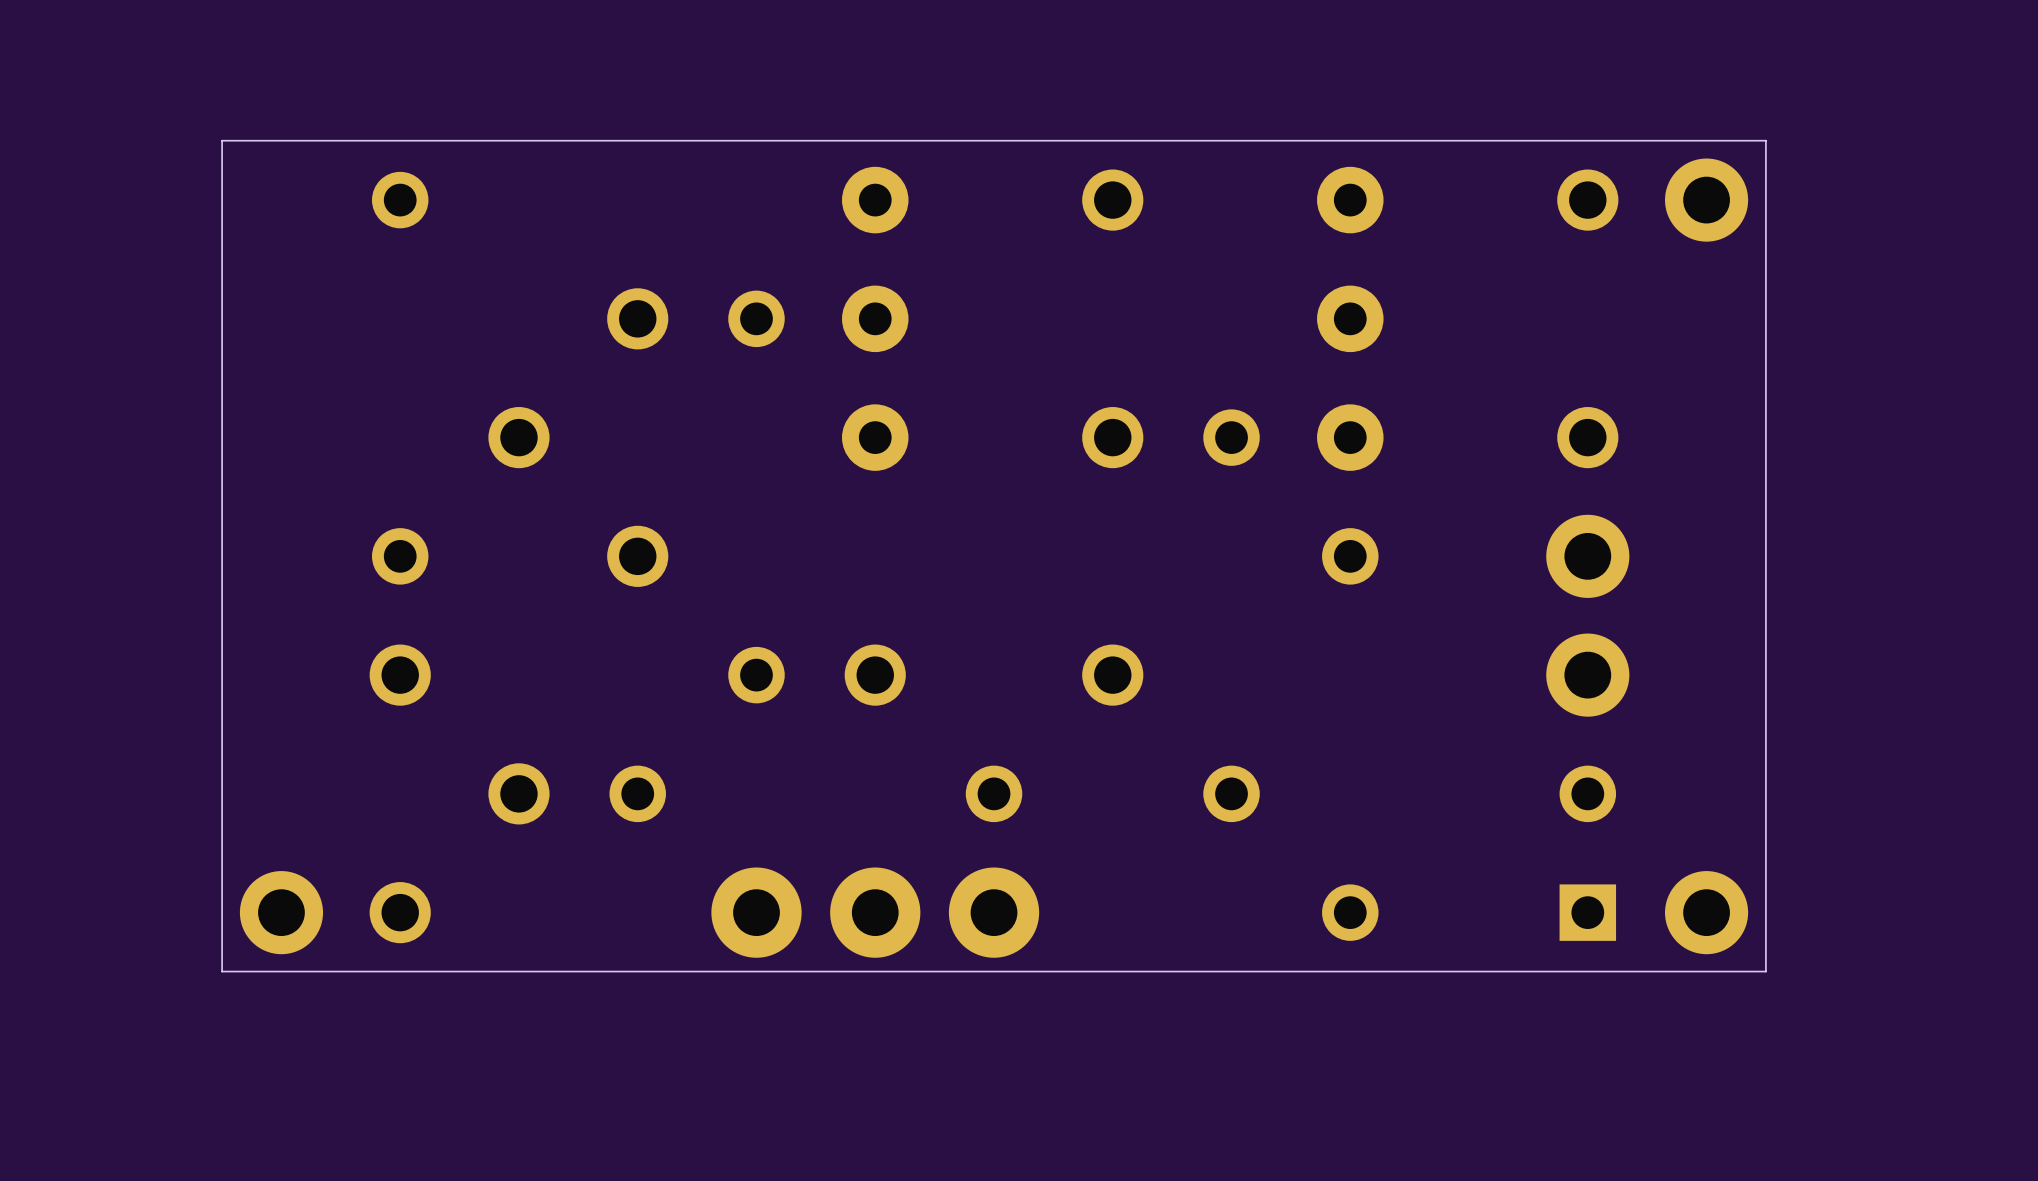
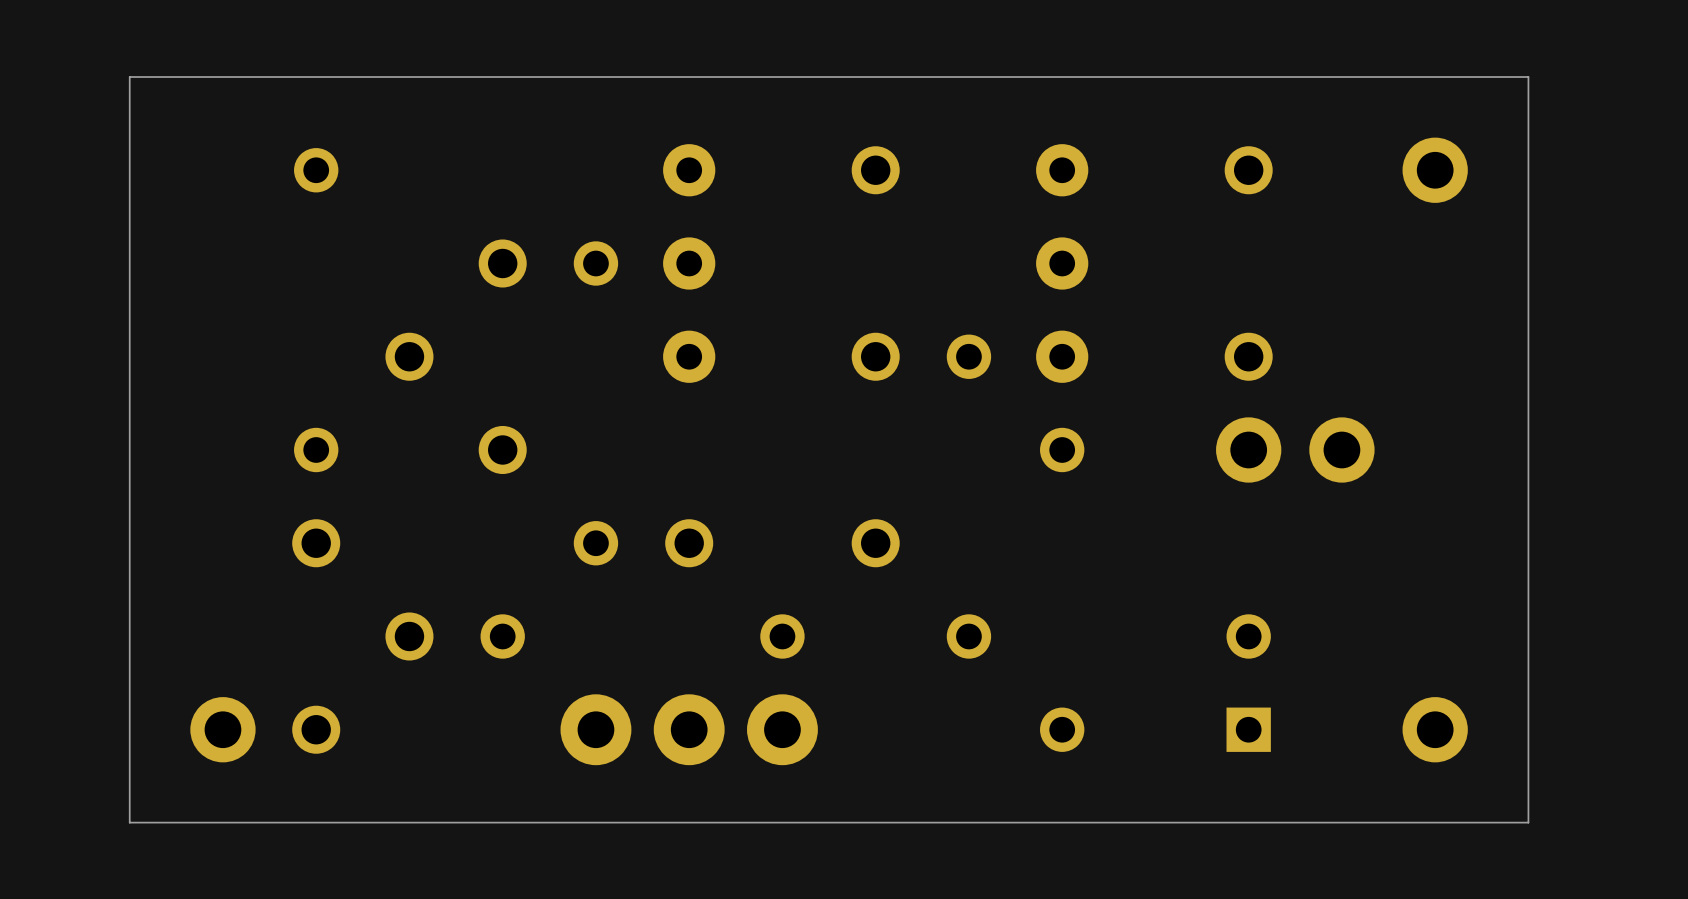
board edge: (1765, 140) (222, 140) (222, 971) (1765, 971) (1765, 140) -> (1528, 77) (1528, 822) (129, 822) (129, 77) (1528, 77)
part position: (1706, 200) -> (1435, 170)
part: none -> (1341, 449)
part: (1587, 675) -> none
part position: (1706, 912) -> (1435, 729)

